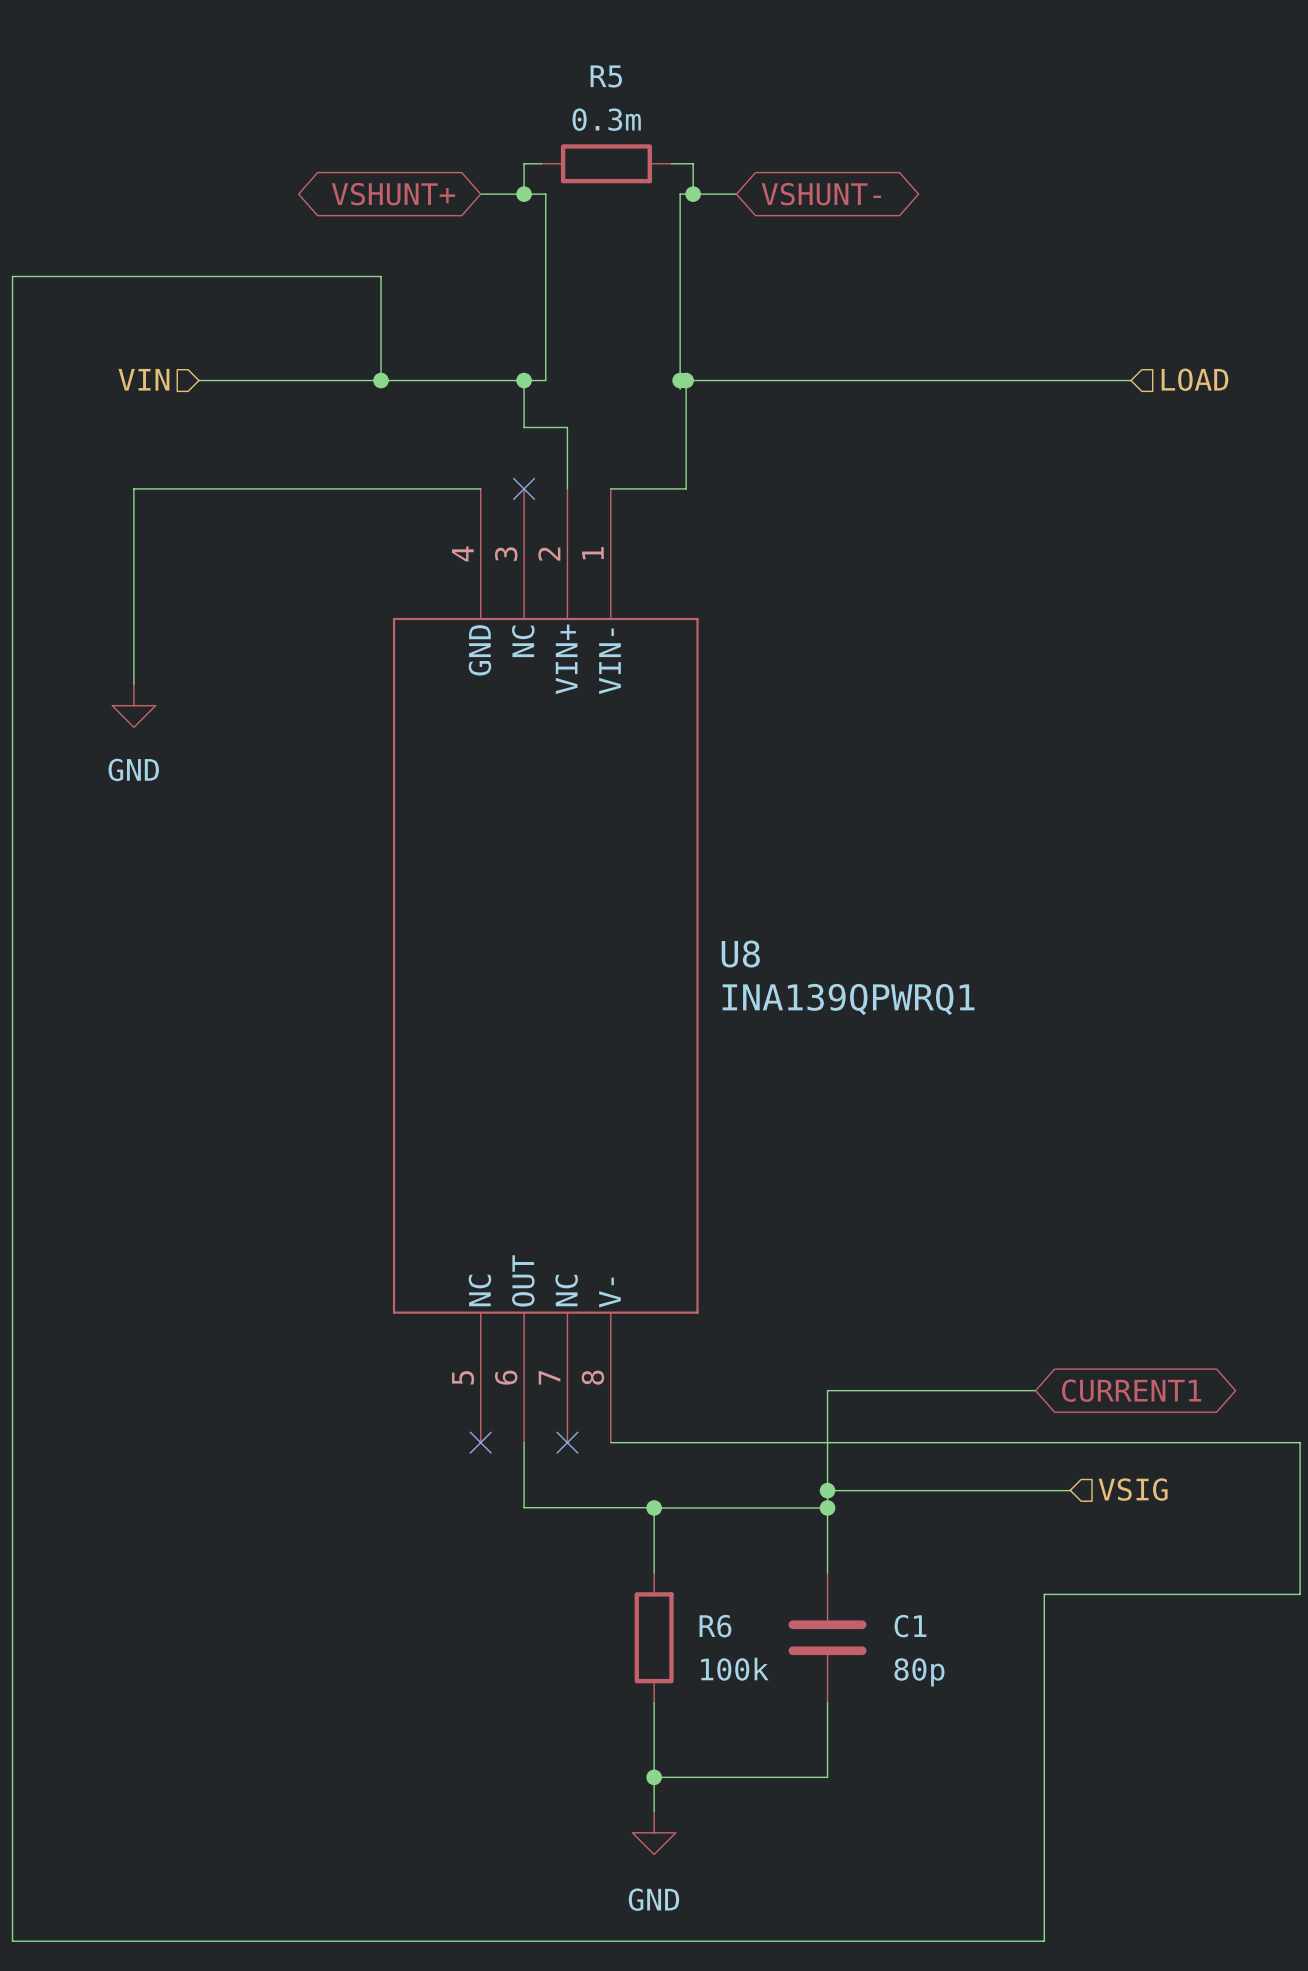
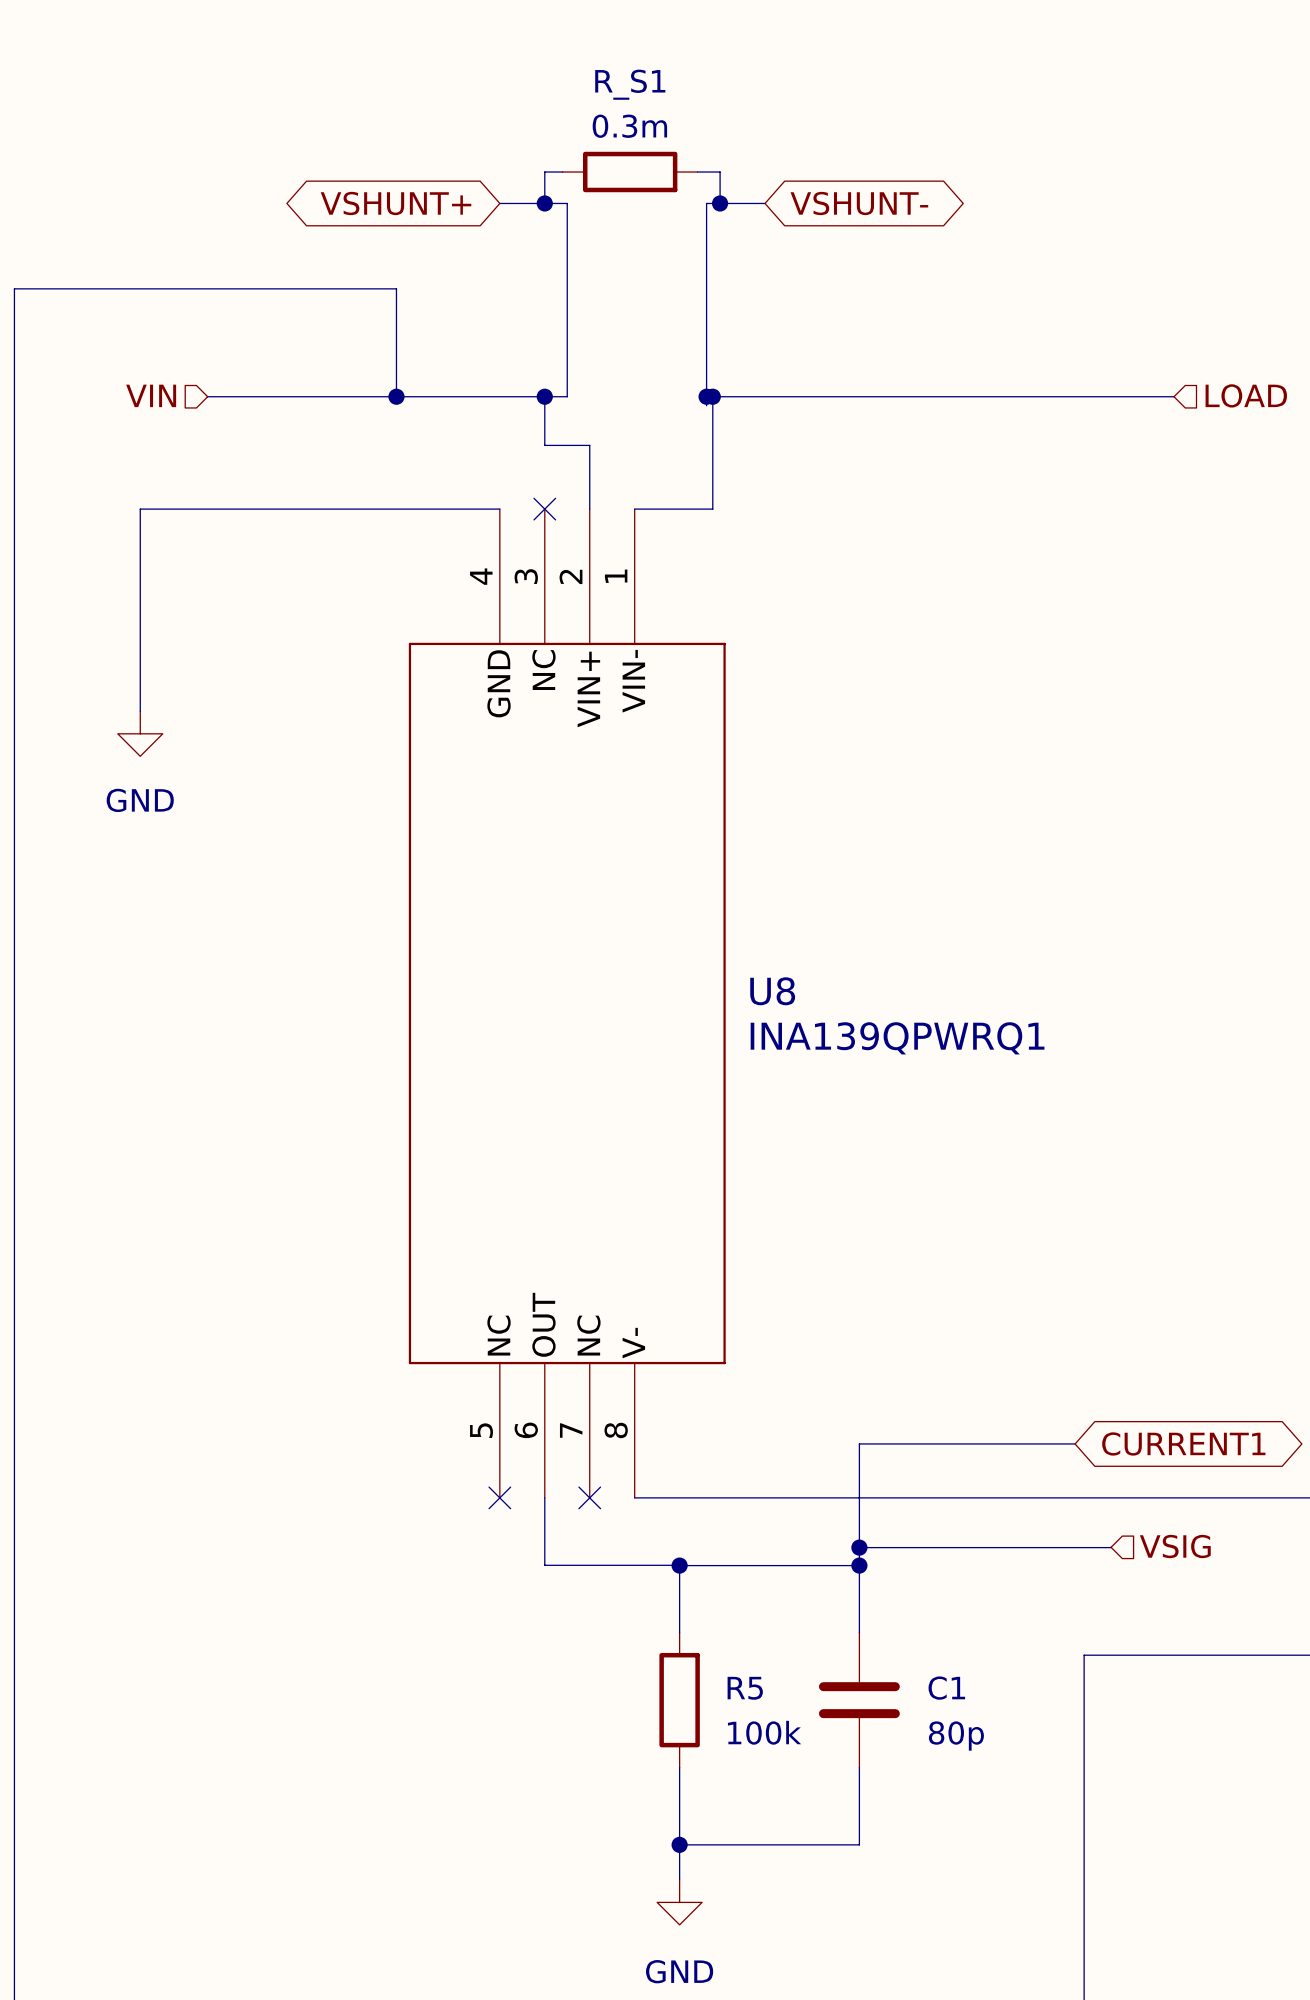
R5 name: R5 (606, 76) -> R_S1 (630, 84)
R6 name: R6 (715, 1626) -> R5 (745, 1688)

